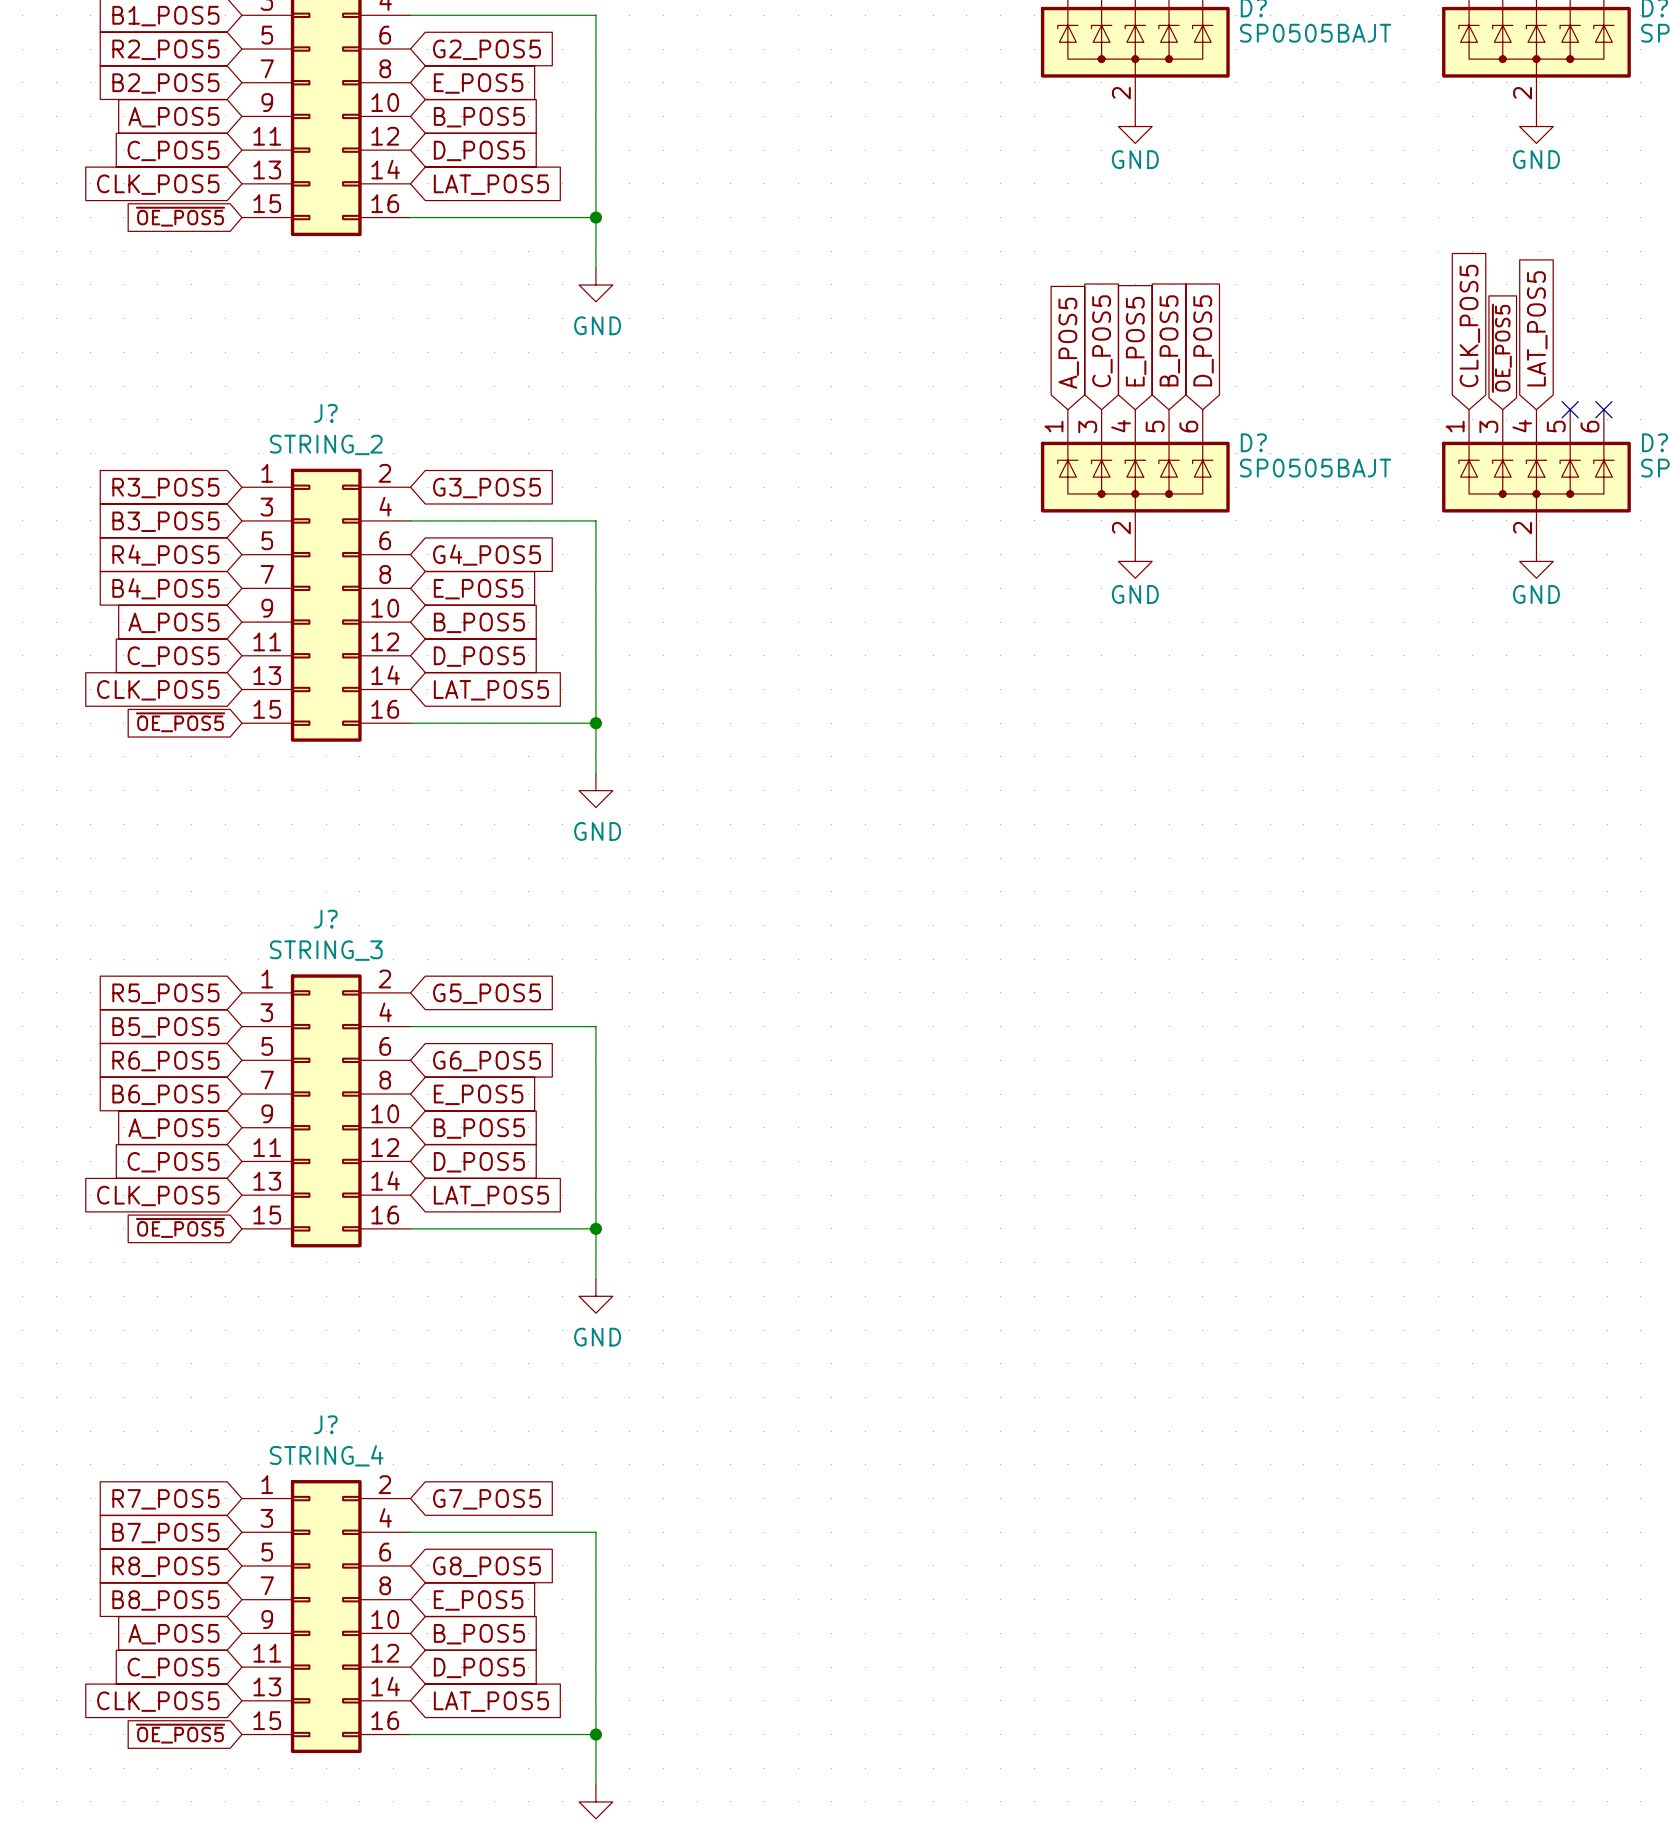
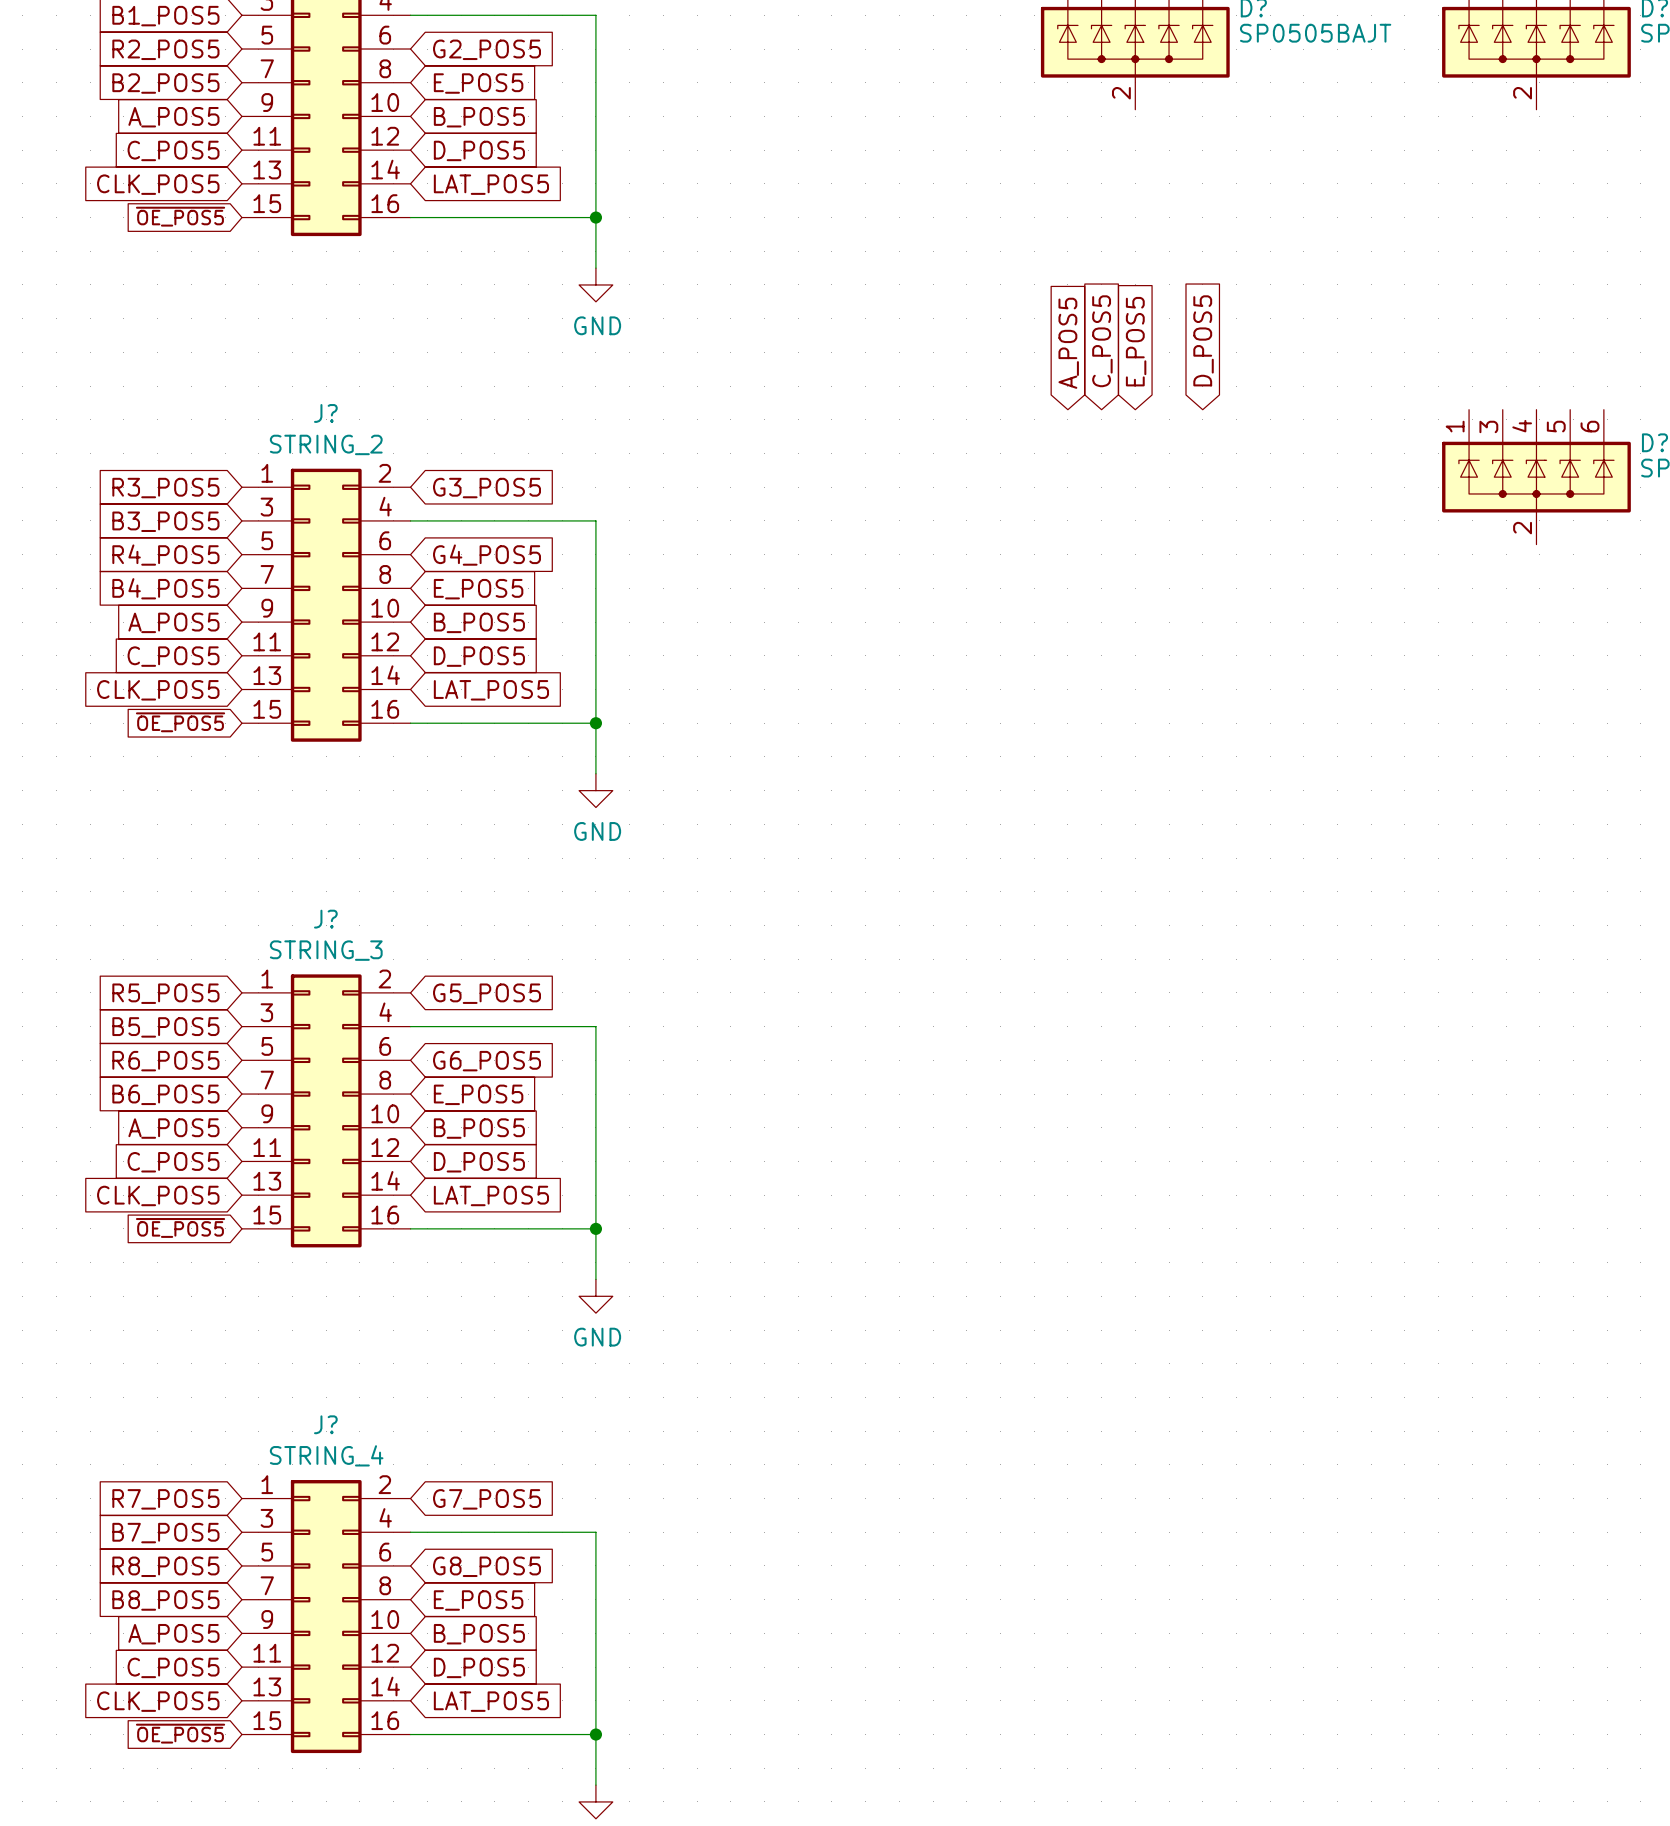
power symbol: GND (1135, 126) -> none
power symbol: GND (1536, 126) -> none
global label: CLK_POS5 (1469, 326) -> none
global label: LAT_POS5 (1537, 328) -> none
global label: B_POS5 (1169, 340) -> none
global label: ~{OE_POS5} (1501, 348) -> none
no-connect mark: (1570, 409) -> none
no-connect mark: (1603, 409) -> none
D?: SP0505BAJT (1135, 477) -> none
power symbol: GND (1135, 561) -> none
power symbol: GND (1536, 561) -> none

